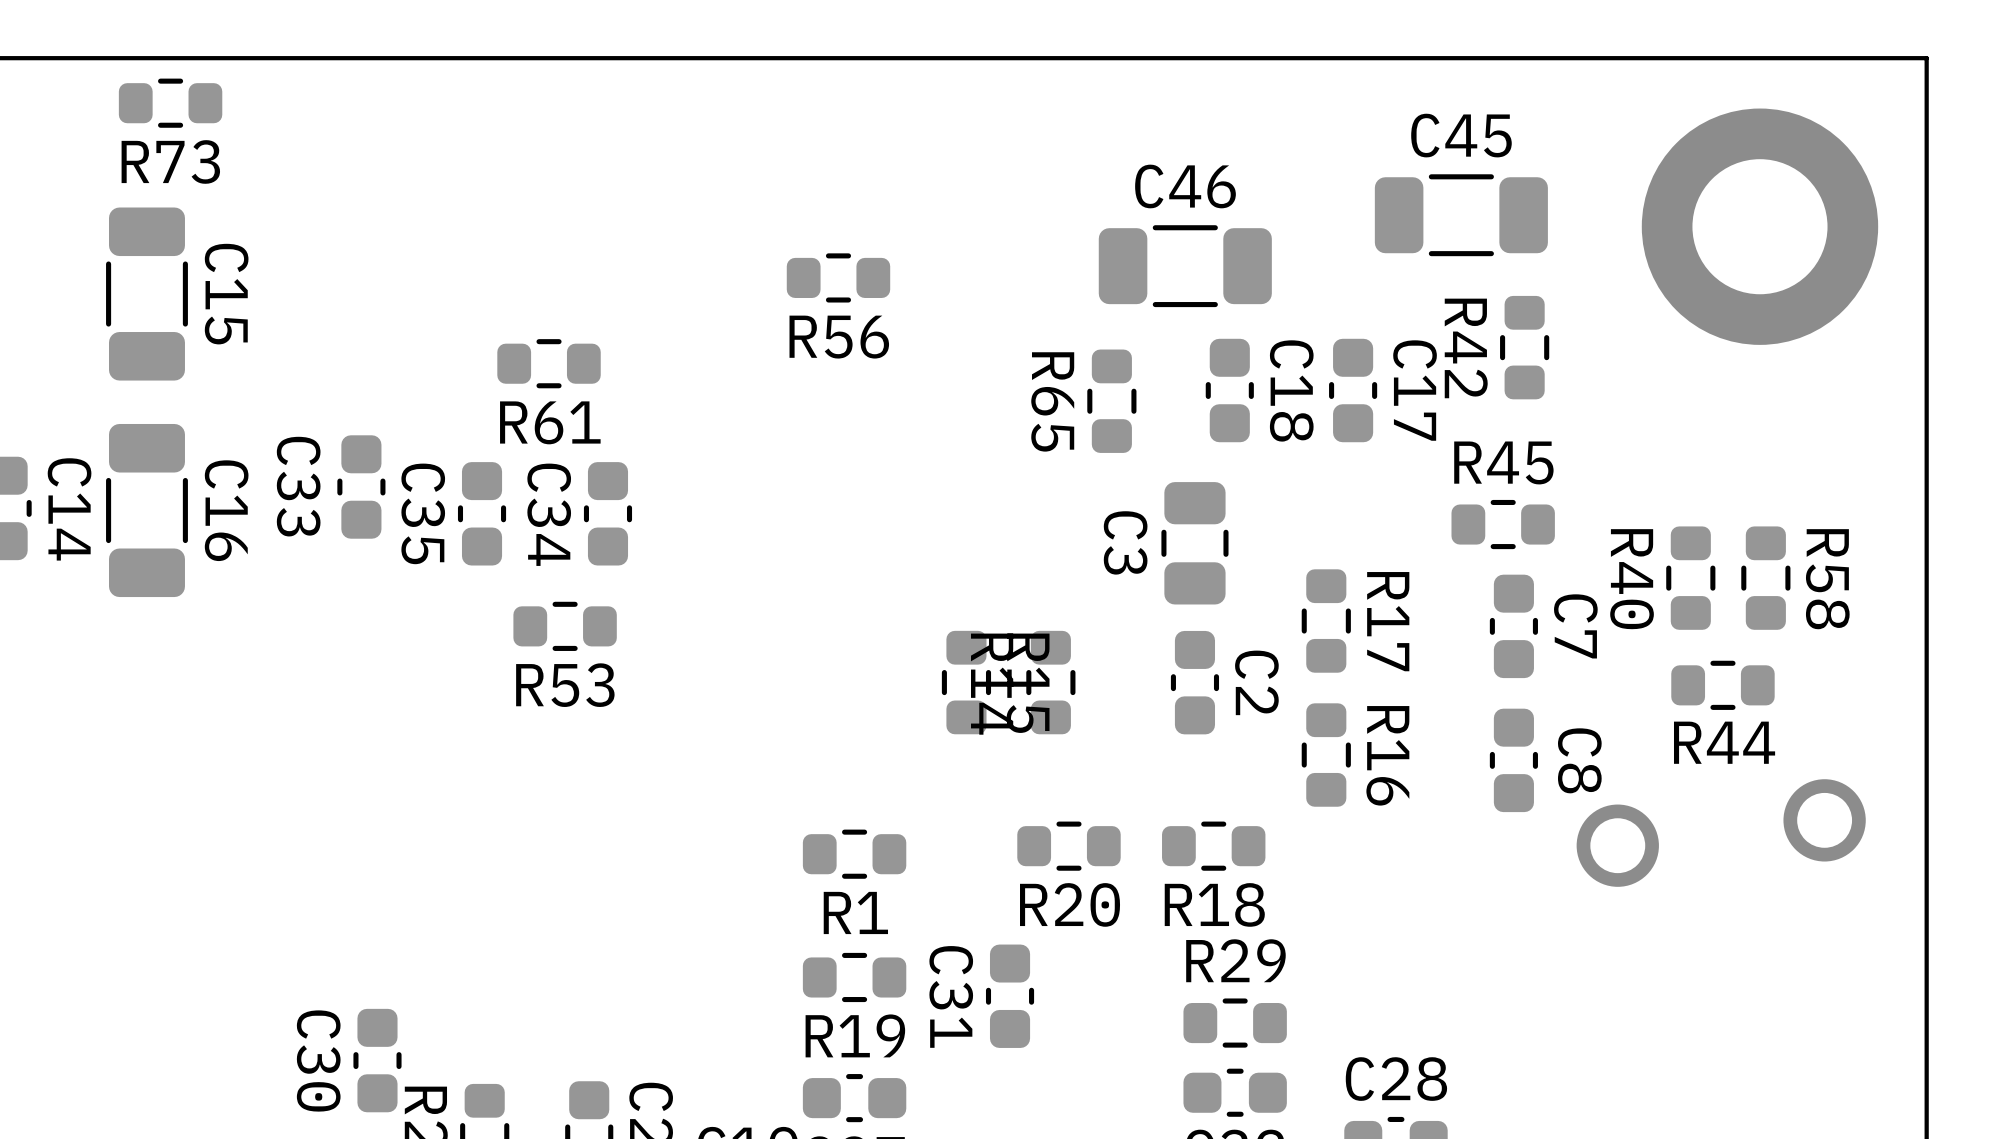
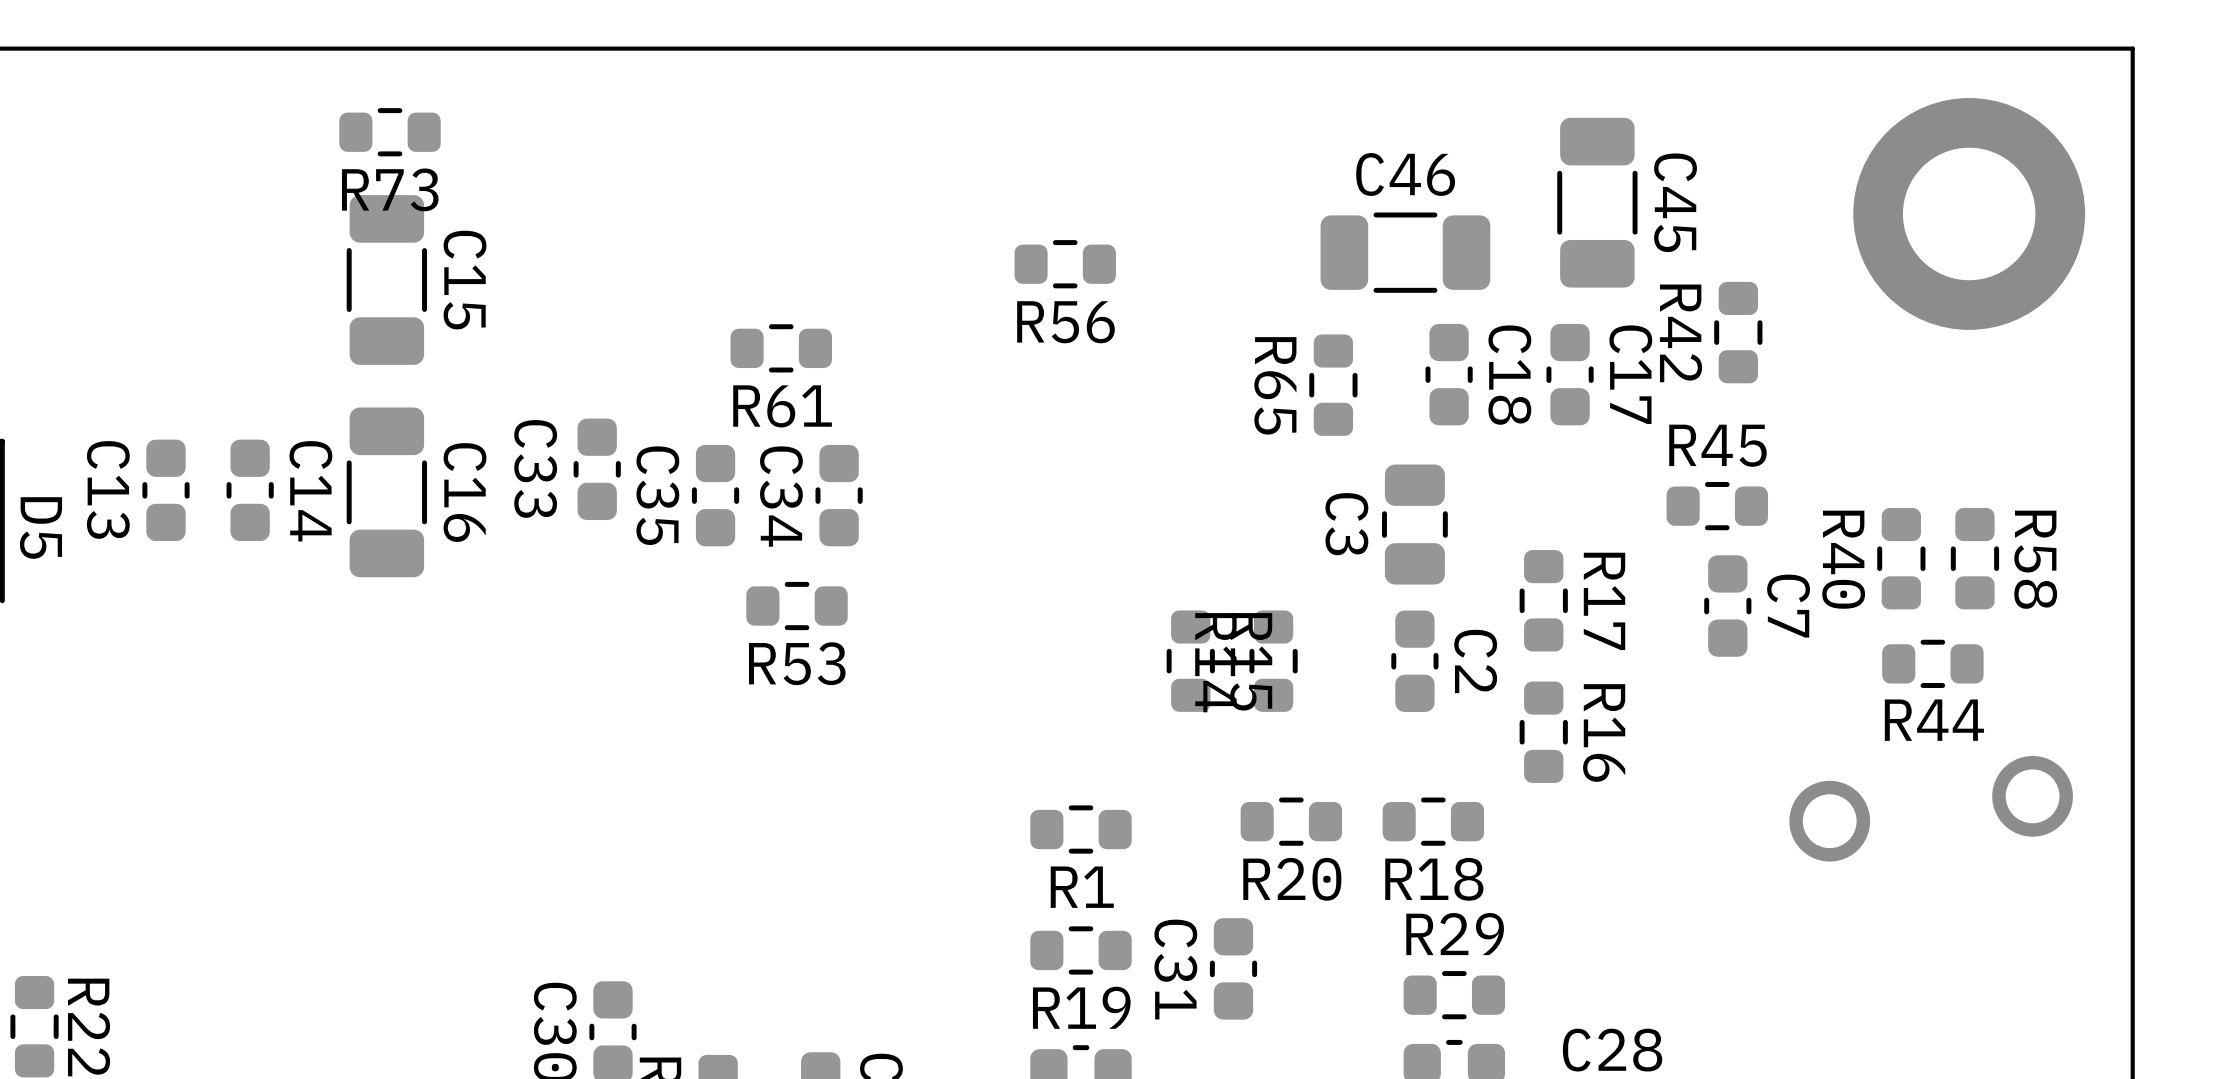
R73 position: (170, 103) -> (390, 132)
C45 rotation: 0° (1461, 215) -> 90° clockwise (1597, 202)
C8: (1513, 760) -> none

